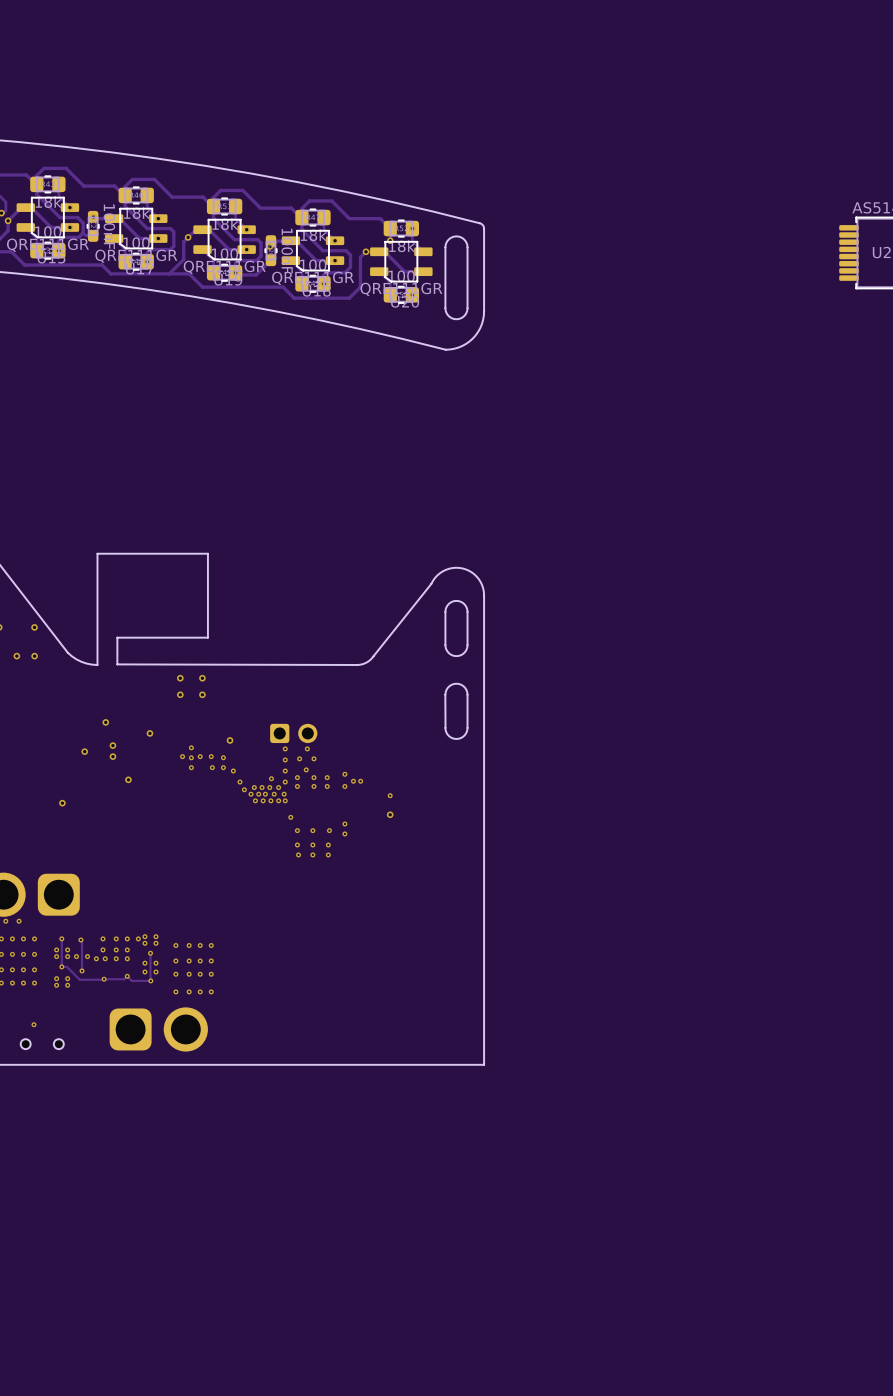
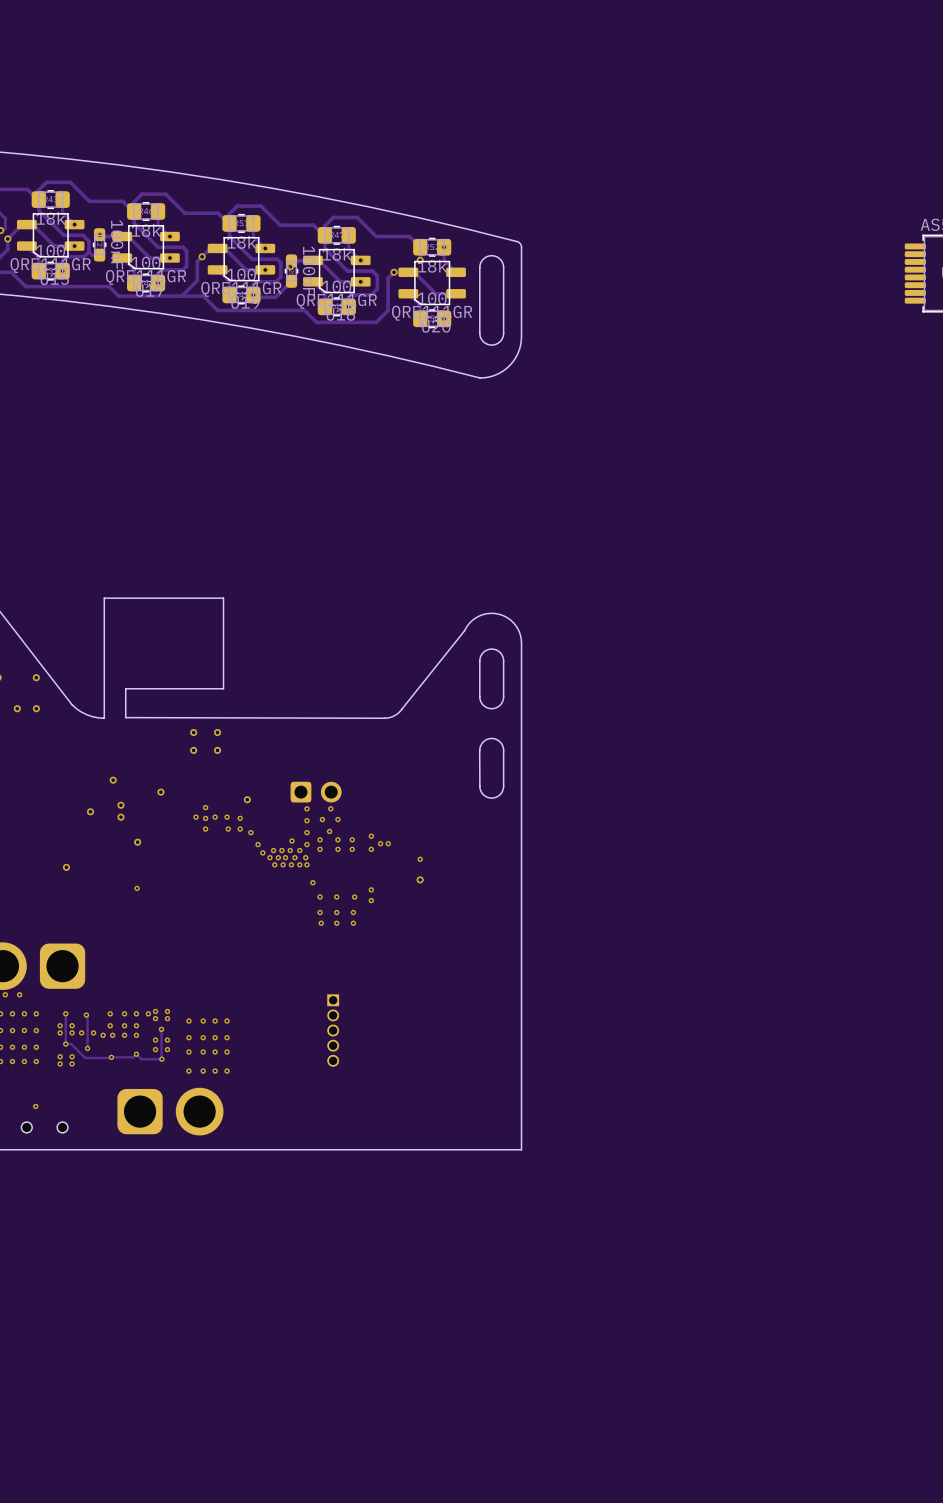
via: none -> (137, 888)
part: none -> (333, 1030)

